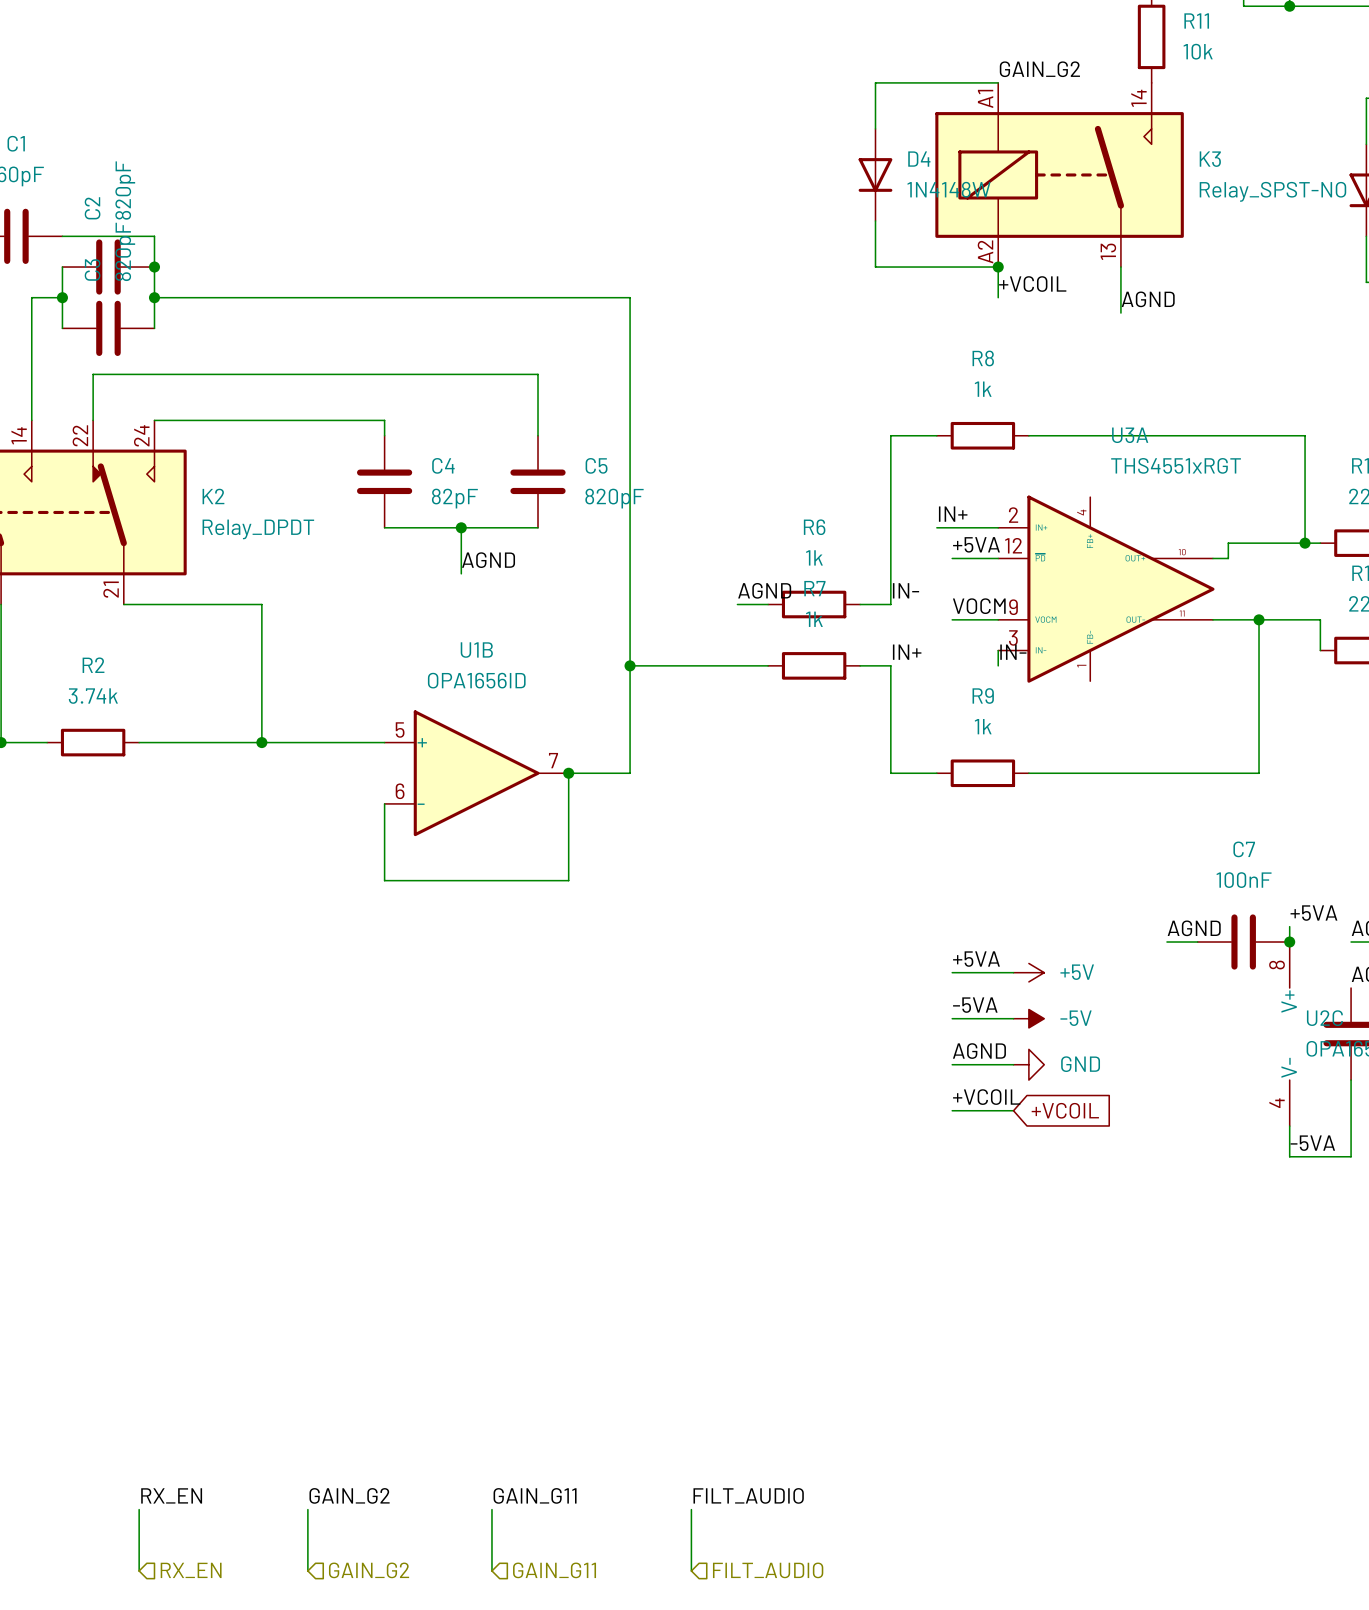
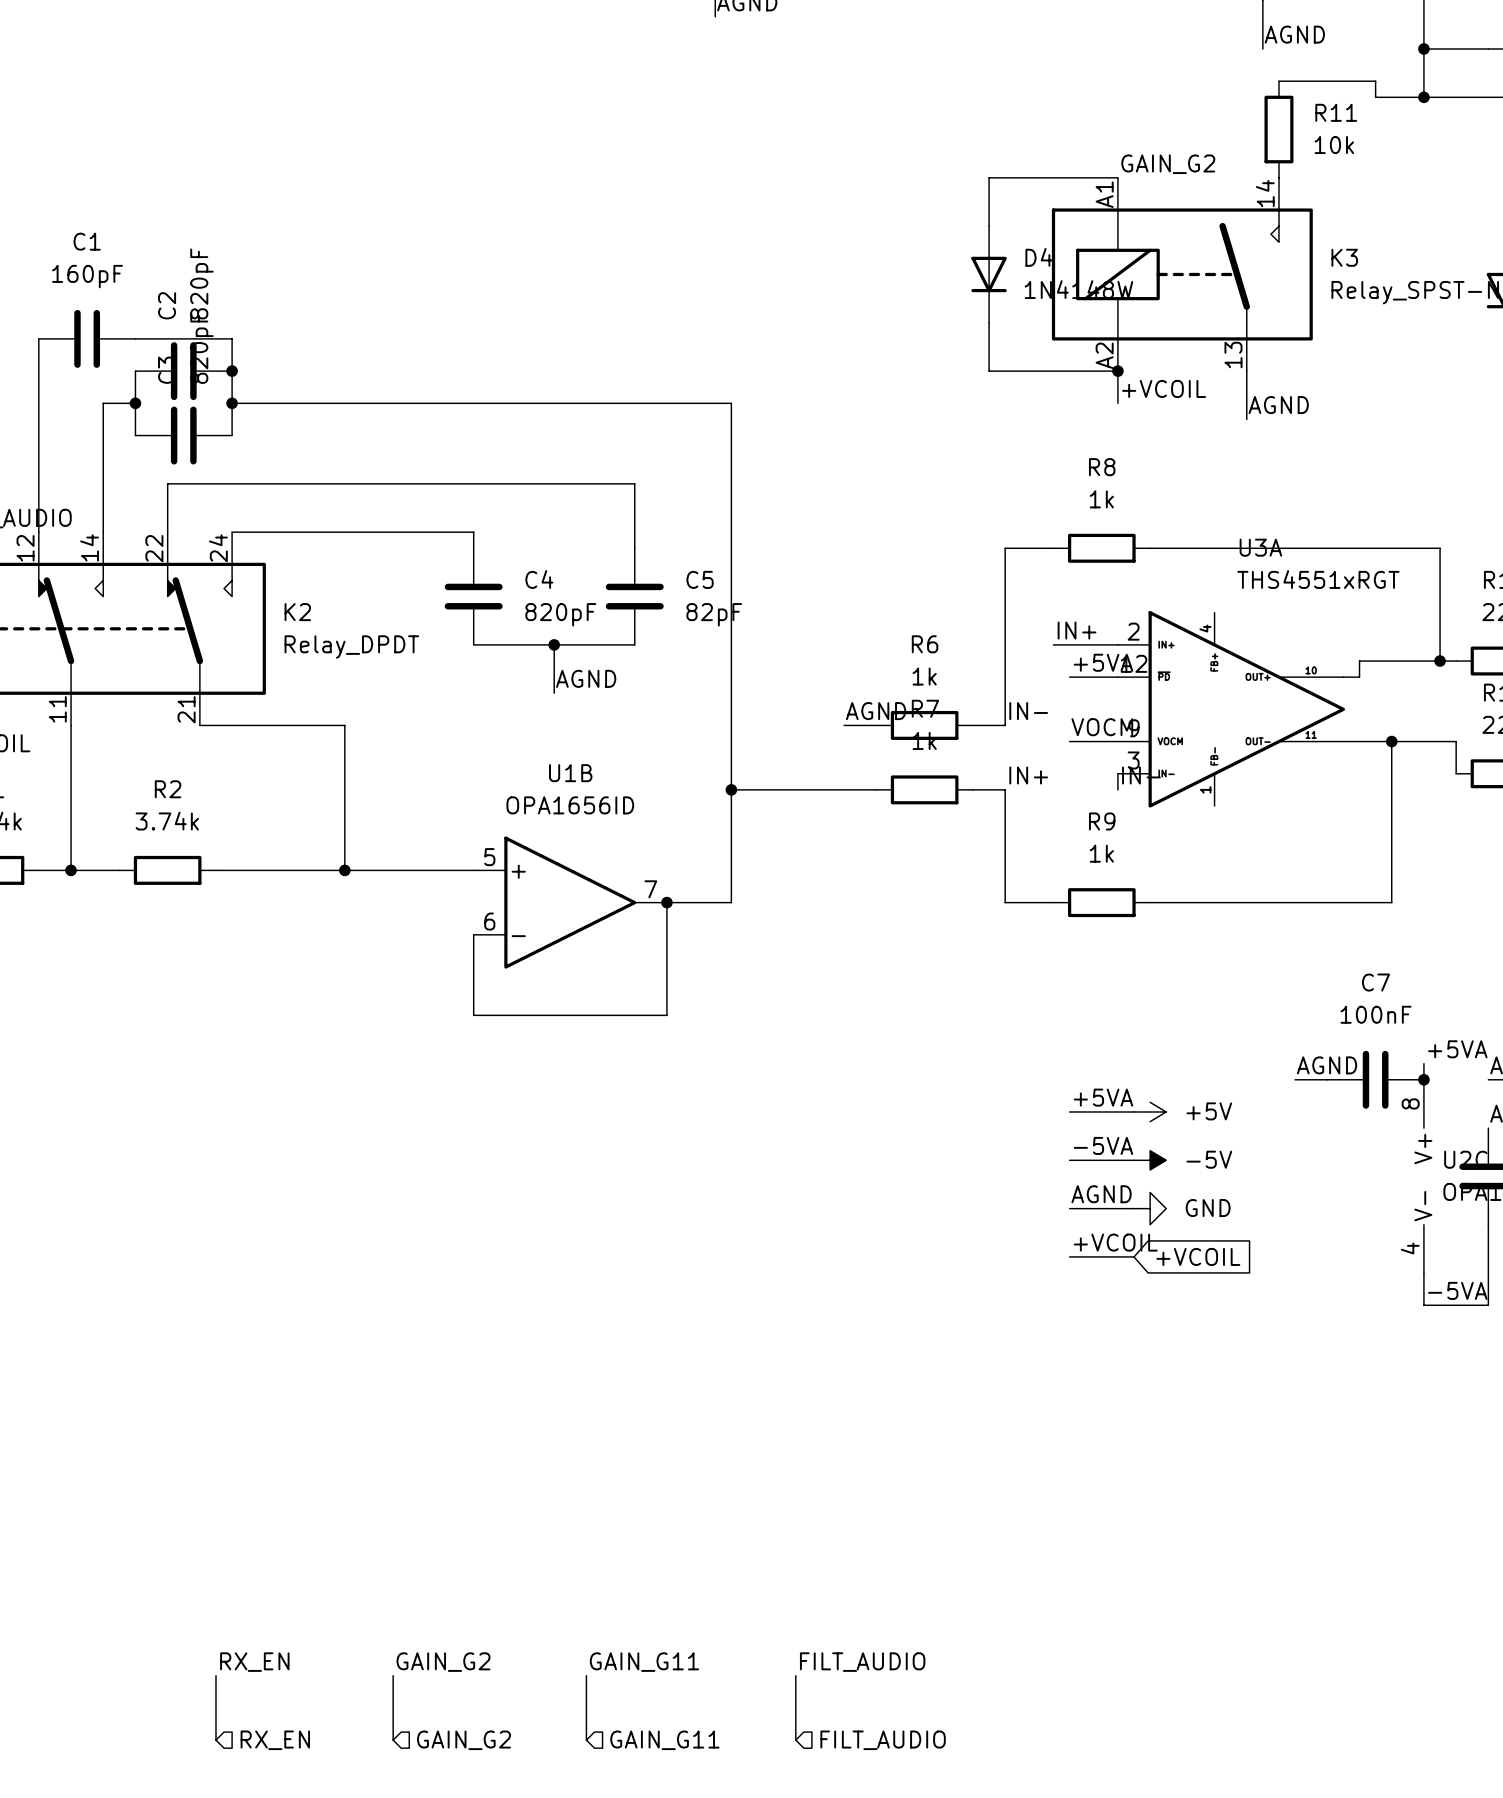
C4 value: 82pF (454, 498) -> 820pF (560, 614)
C5 value: 820pF (614, 498) -> 82pF (714, 614)

